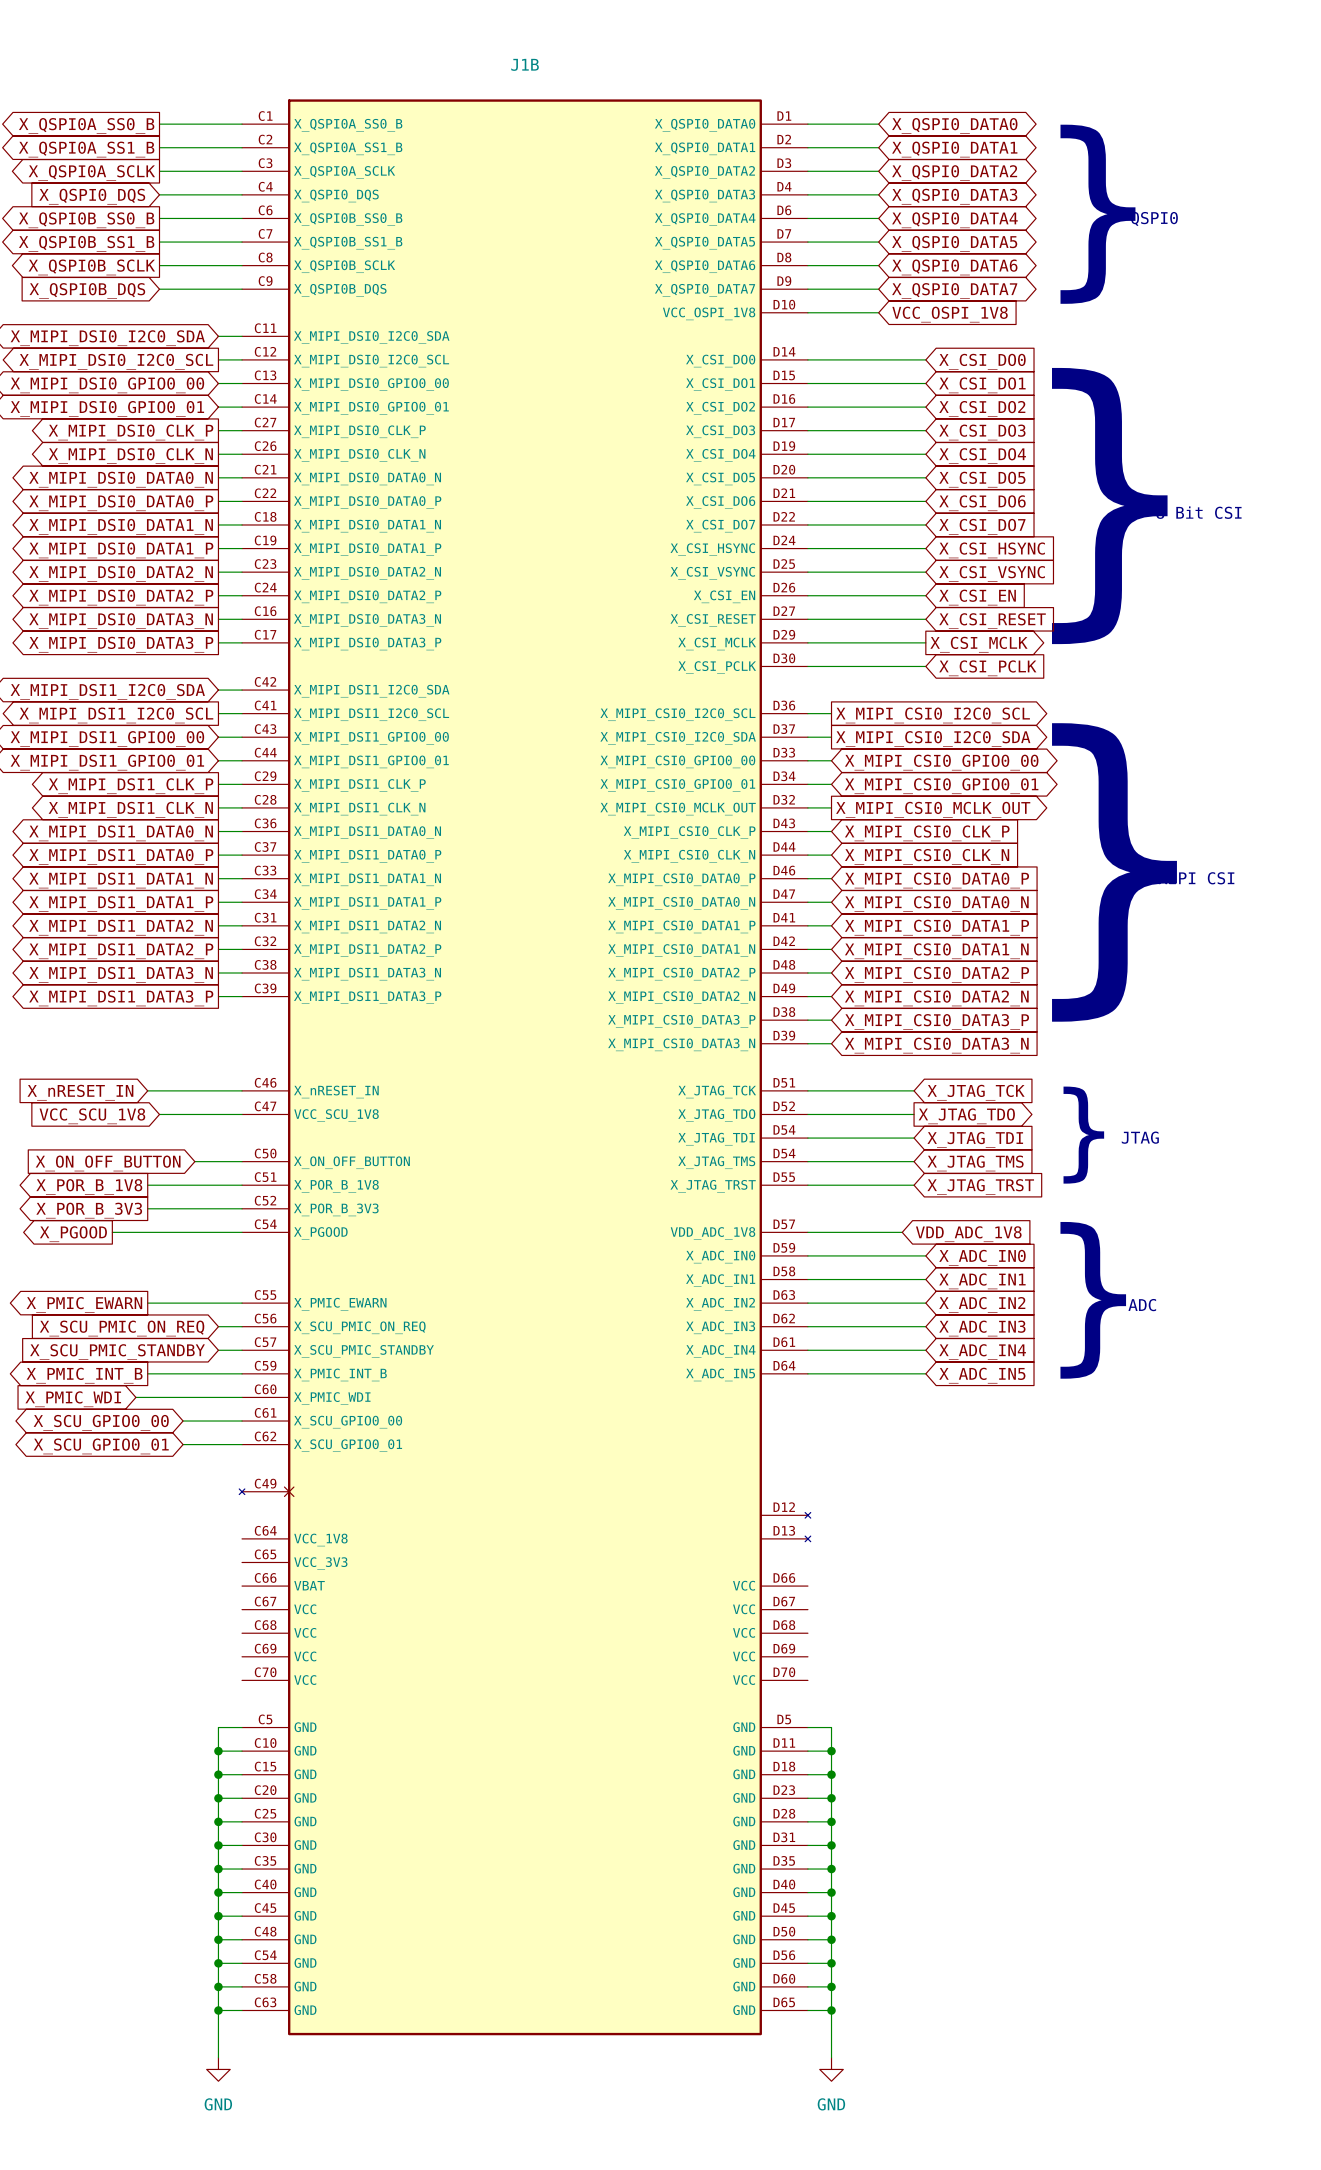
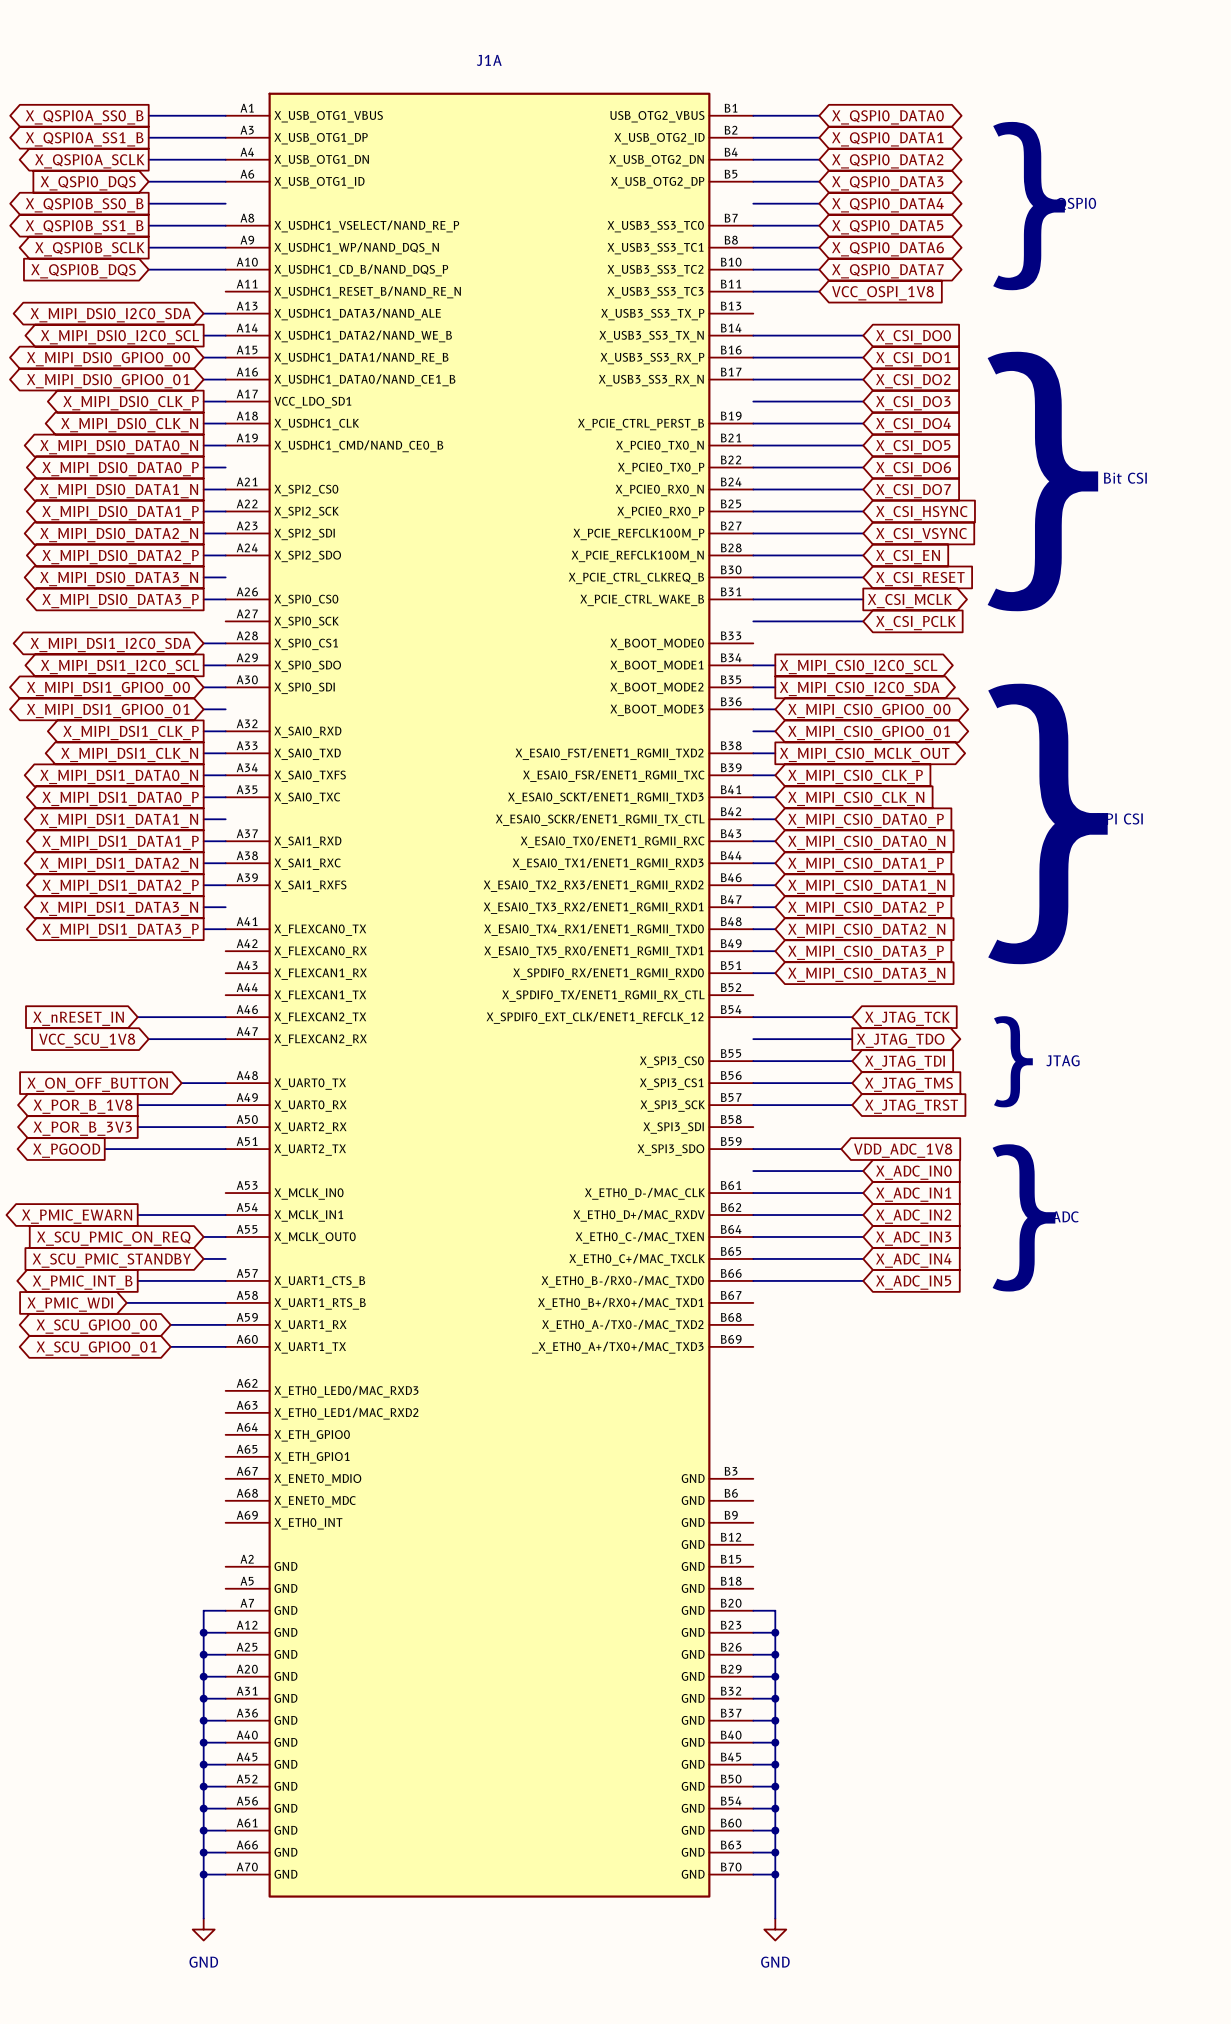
J1B: (524, 1067) -> none
J1A: none -> (489, 995)

